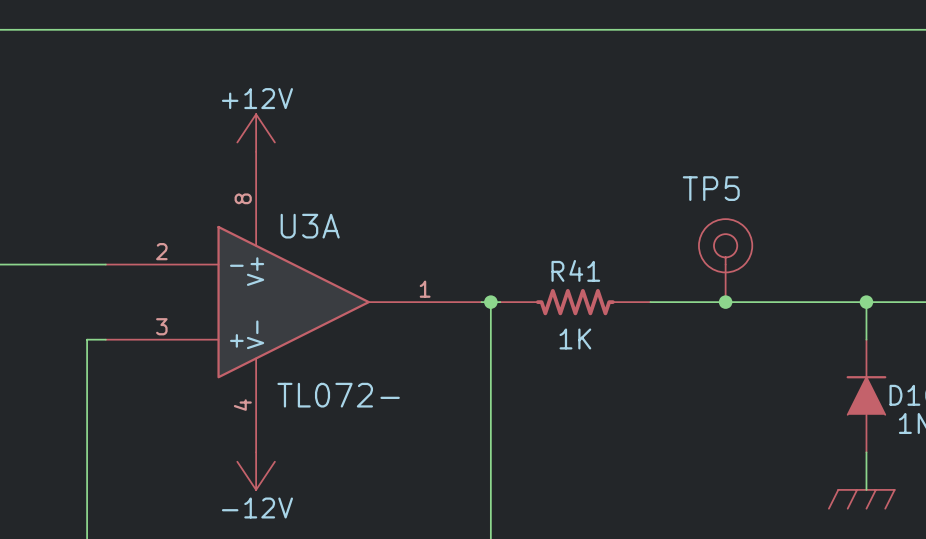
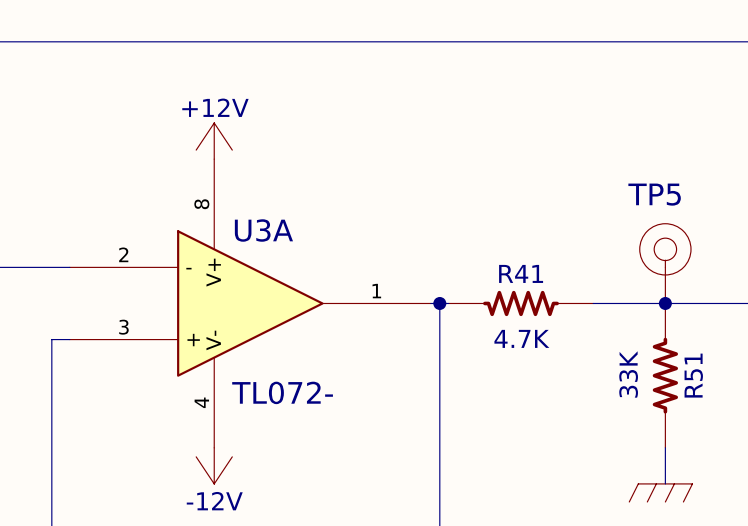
R41 value: 1K (575, 338) -> 4.7K (521, 338)
R51: none -> 33K (665, 375)
wire: none -> (665, 447) (665, 483)
power symbol: none -> (660, 492)

